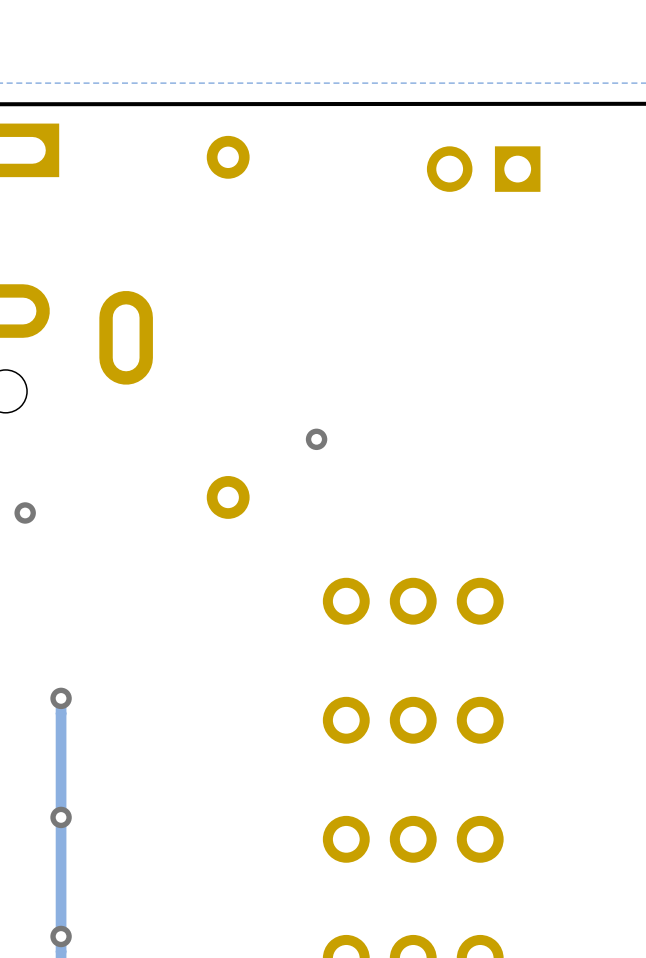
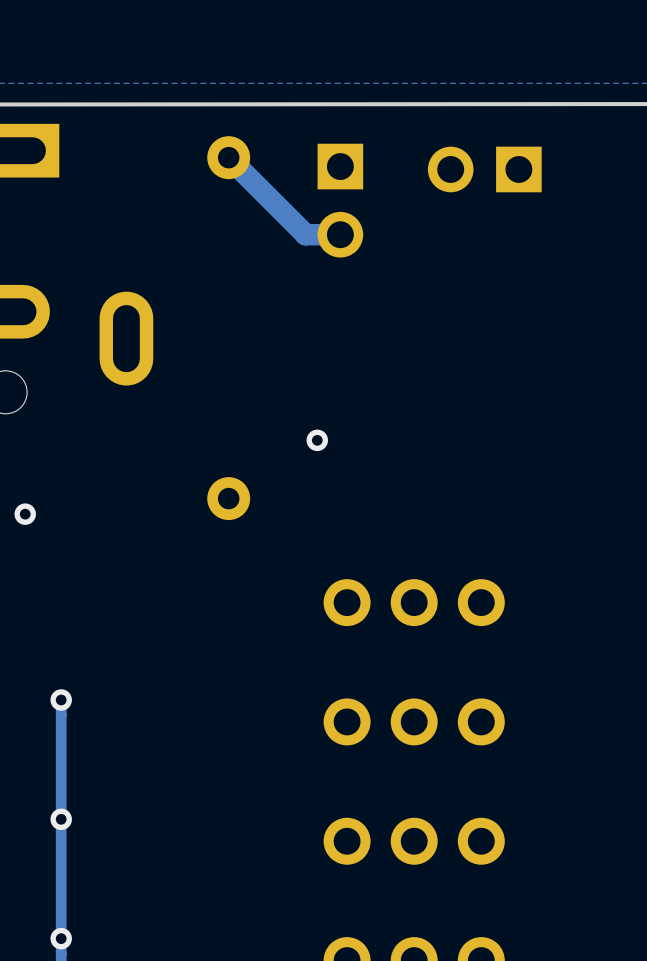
track: none -> (228, 157) (305, 234) (340, 234)
part: none -> (340, 200)

